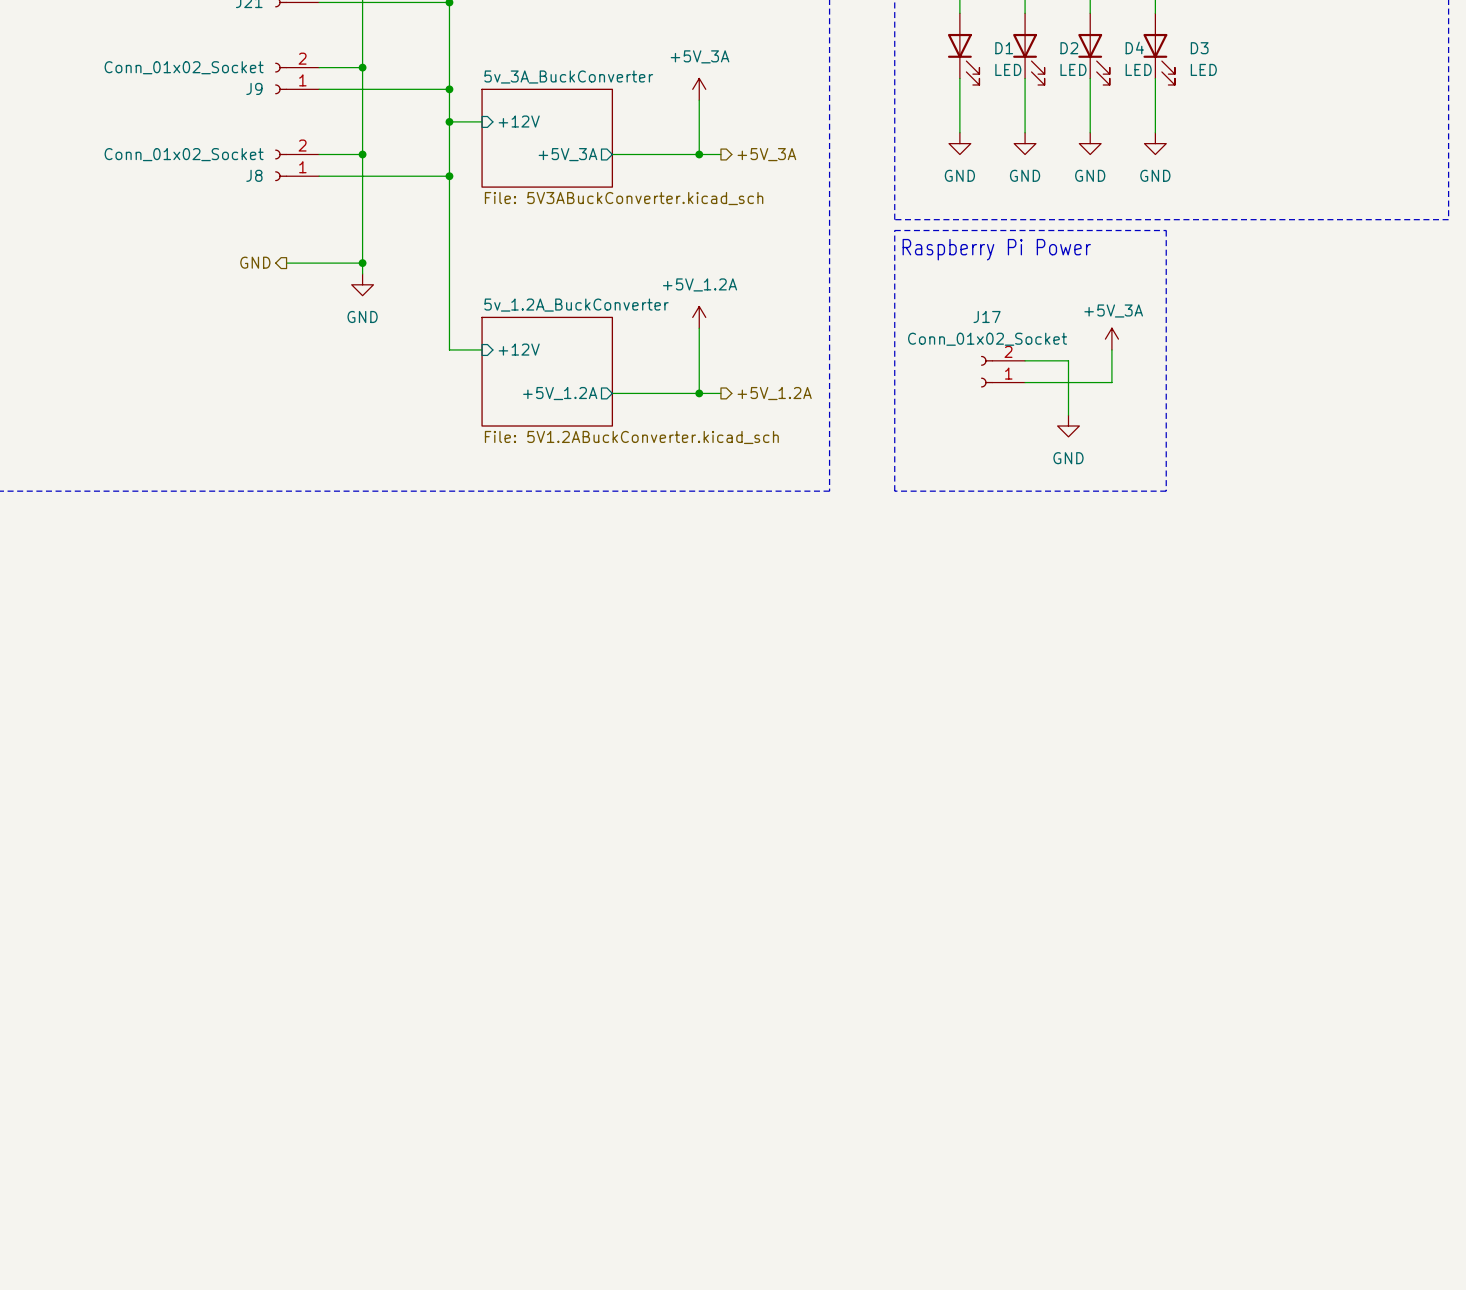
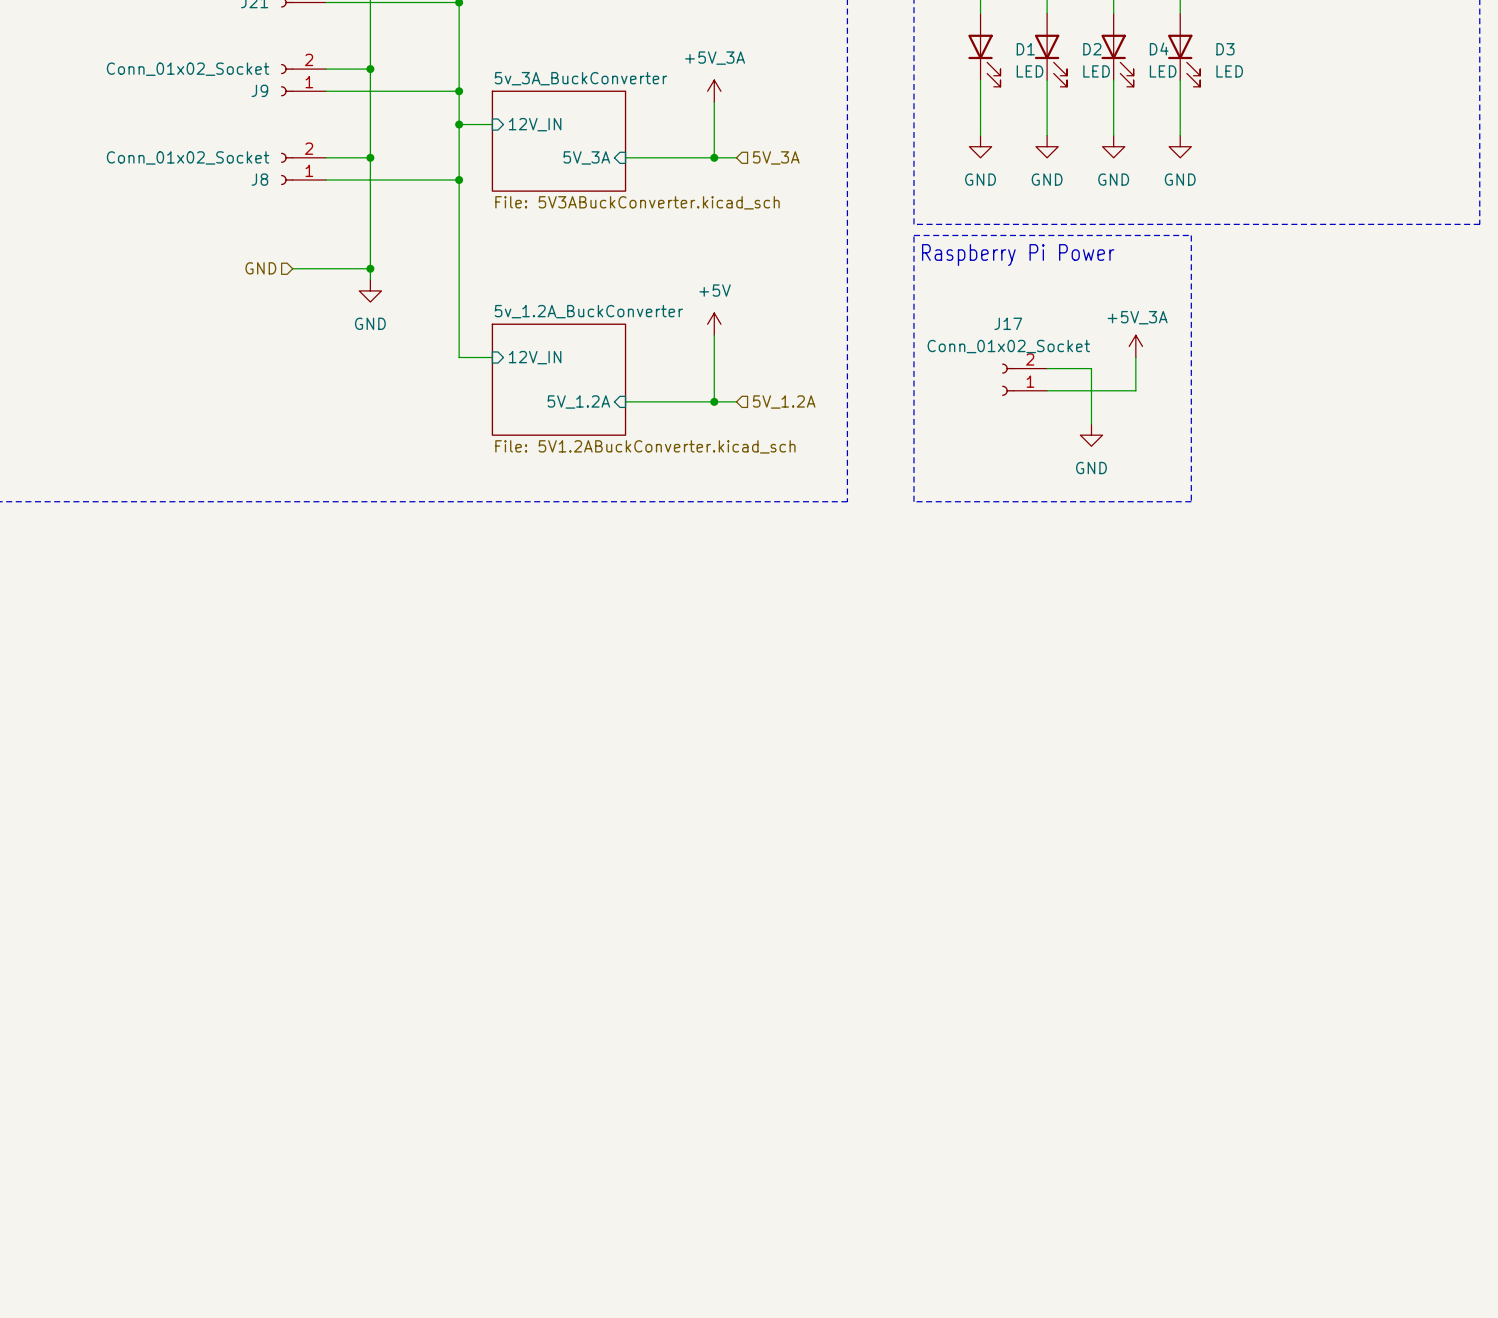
sheet pin: +12V (519, 121) -> 12V_IN (535, 124)
sheet pin shape: output (567, 154) -> input (586, 157)
sheet pin: +5V_3A (567, 154) -> 5V_3A (586, 157)
hierarchical label shape: output (766, 154) -> input (776, 157)
hierarchical label: +5V_3A (766, 154) -> 5V_3A (776, 157)
hierarchical label shape: output (255, 262) -> input (260, 268)
power symbol: +5V_1.2A (699, 317) -> +5V (714, 324)
sheet pin: +12V (519, 349) -> 12V_IN (535, 357)
sheet pin shape: output (560, 393) -> input (578, 401)
sheet pin: +5V_1.2A (560, 393) -> 5V_1.2A (578, 401)
hierarchical label shape: output (774, 393) -> input (784, 401)
hierarchical label: +5V_1.2A (774, 393) -> 5V_1.2A (784, 401)

